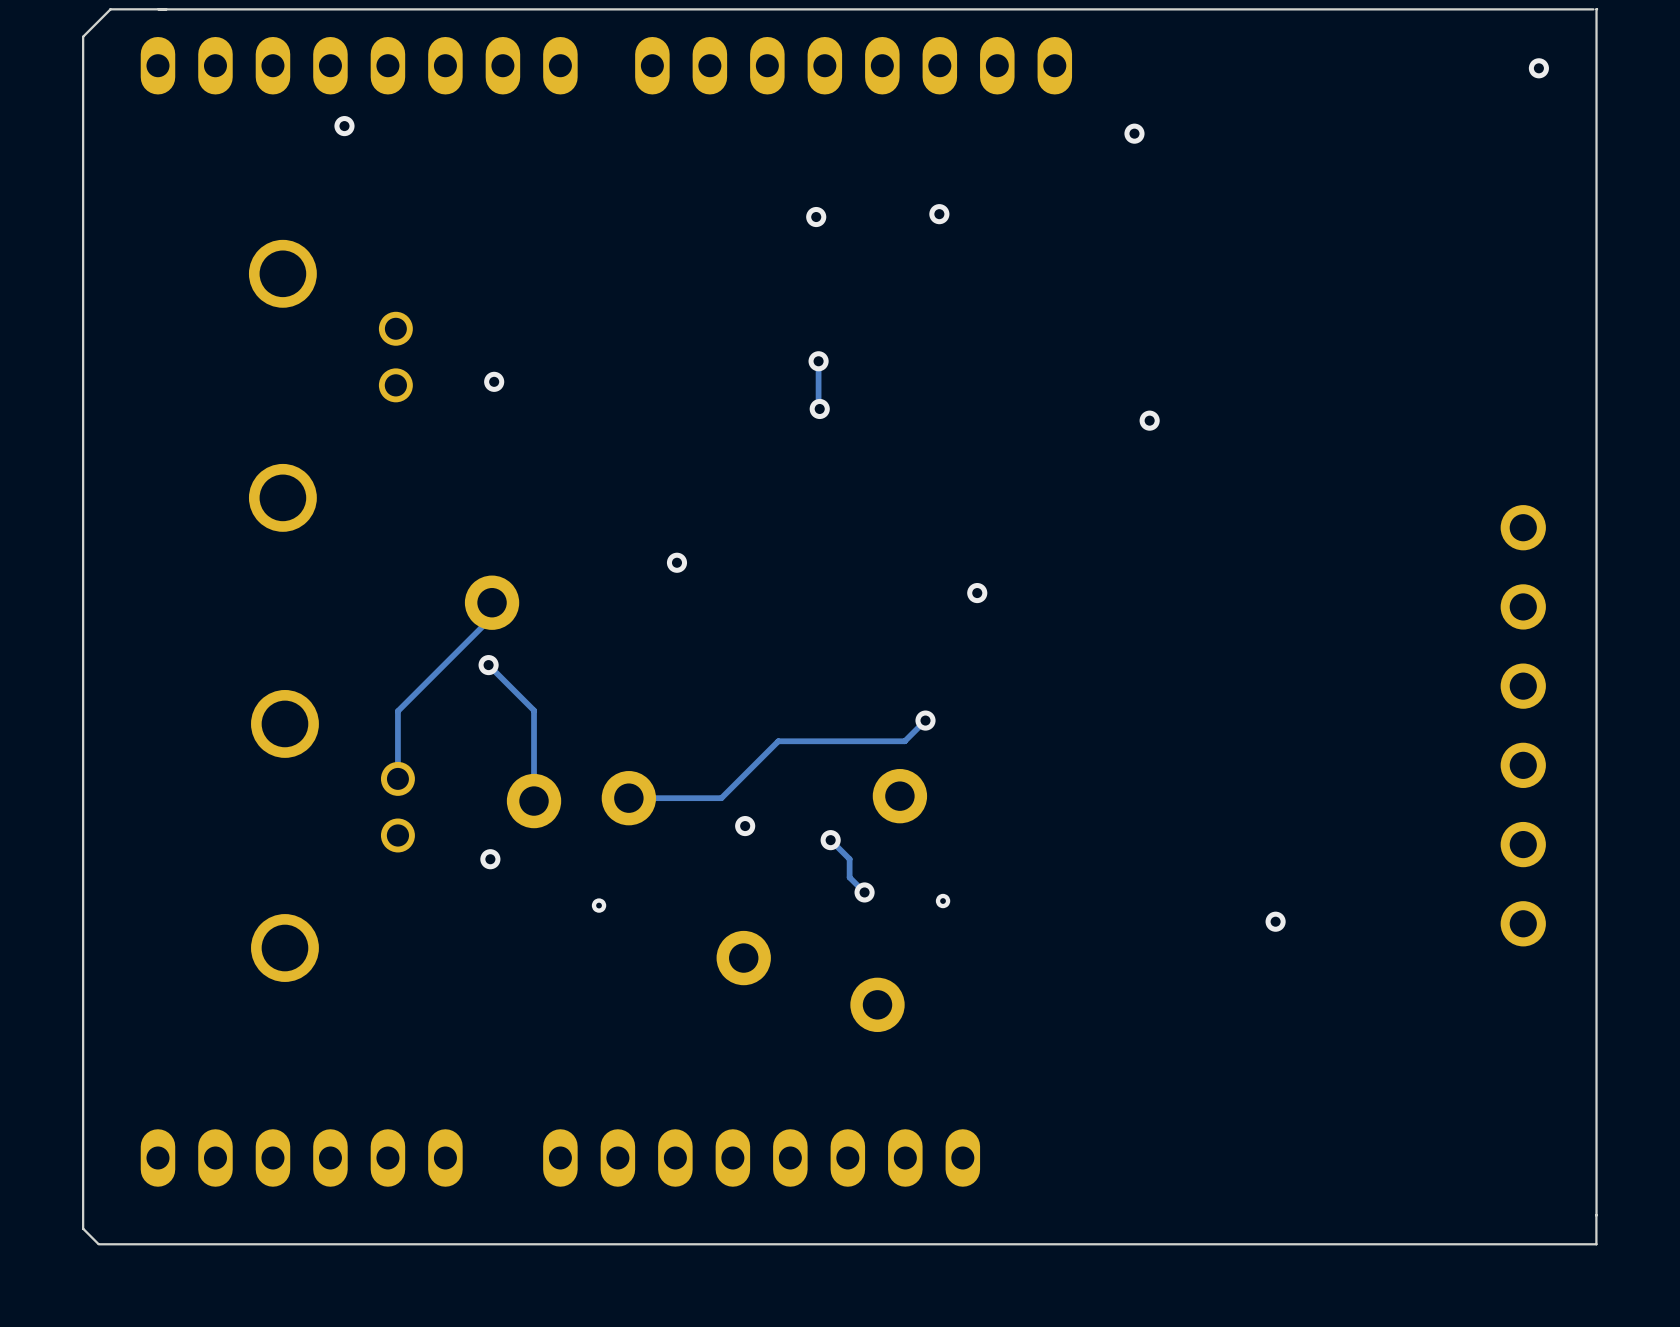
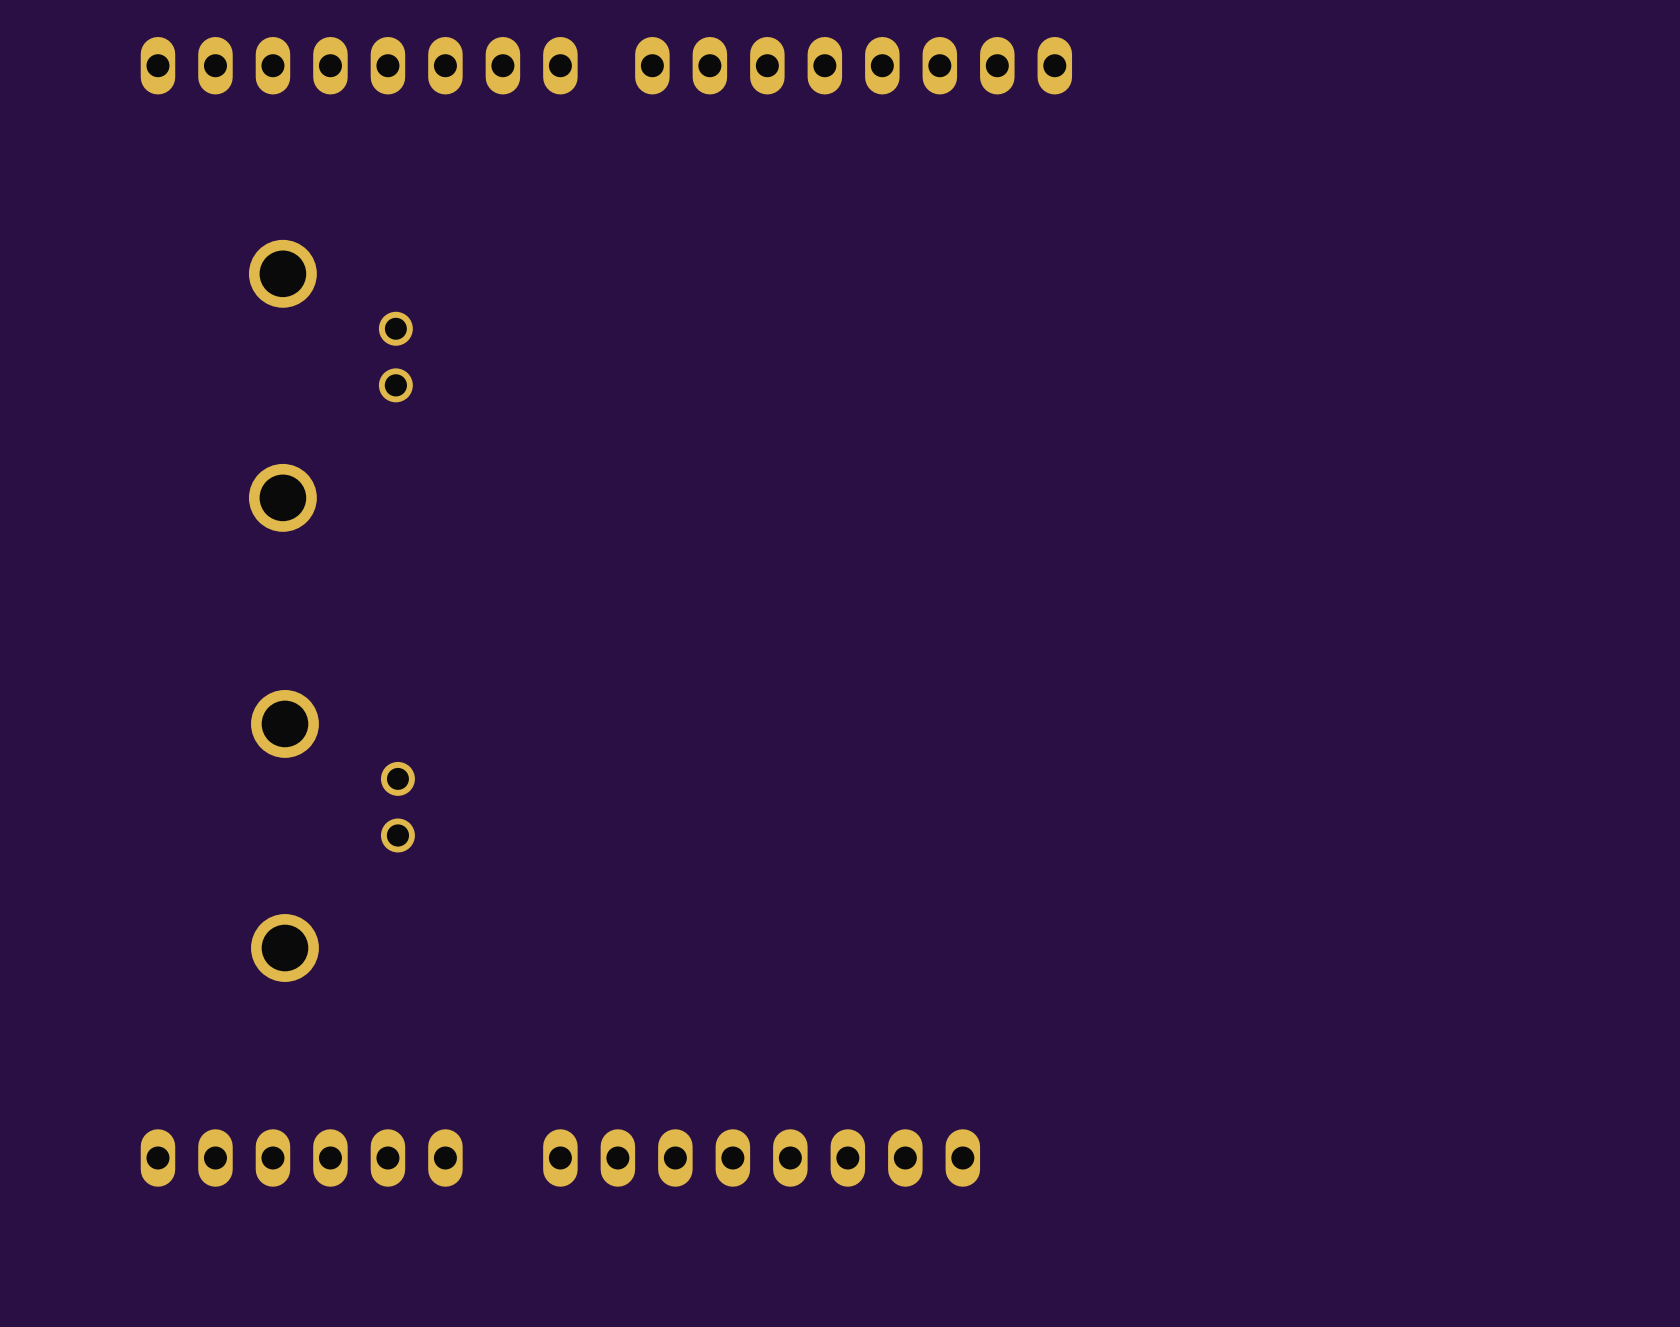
board edge: (1593, 9) (110, 9) -> none
board edge: (1597, 9) (1596, 1244) (98, 1244) -> none
board edge: (109, 10) (83, 36) (83, 1228) (98, 1243) -> none
via: (1538, 68) -> none
via: (344, 126) -> none
via: (1134, 133) -> none
via: (939, 214) -> none
via: (816, 217) -> none
track: (818, 361) (819, 408) -> none
via: (818, 361) -> none
via: (494, 381) -> none
via: (819, 408) -> none
via: (1149, 420) -> none
via: (676, 562) -> none
via: (977, 593) -> none
track: (492, 602) (492, 617) (397, 711) (397, 778) -> none
part: (492, 602) -> none
track: (488, 665) (534, 710) (534, 801) -> none
via: (488, 665) -> none
track: (925, 720) (904, 741) (778, 741) (721, 798) (628, 798) -> none
via: (925, 720) -> none
part: (1523, 725) -> none
part: (899, 796) -> none
part: (628, 798) -> none
part: (534, 801) -> none
via: (745, 826) -> none
track: (830, 840) (849, 859) (849, 877) (864, 892) -> none
via: (830, 840) -> none
via: (490, 859) -> none
via: (864, 892) -> none
via: (943, 901) -> none
via: (599, 905) -> none
via: (1275, 921) -> none
part: (743, 958) -> none
part: (877, 1004) -> none

